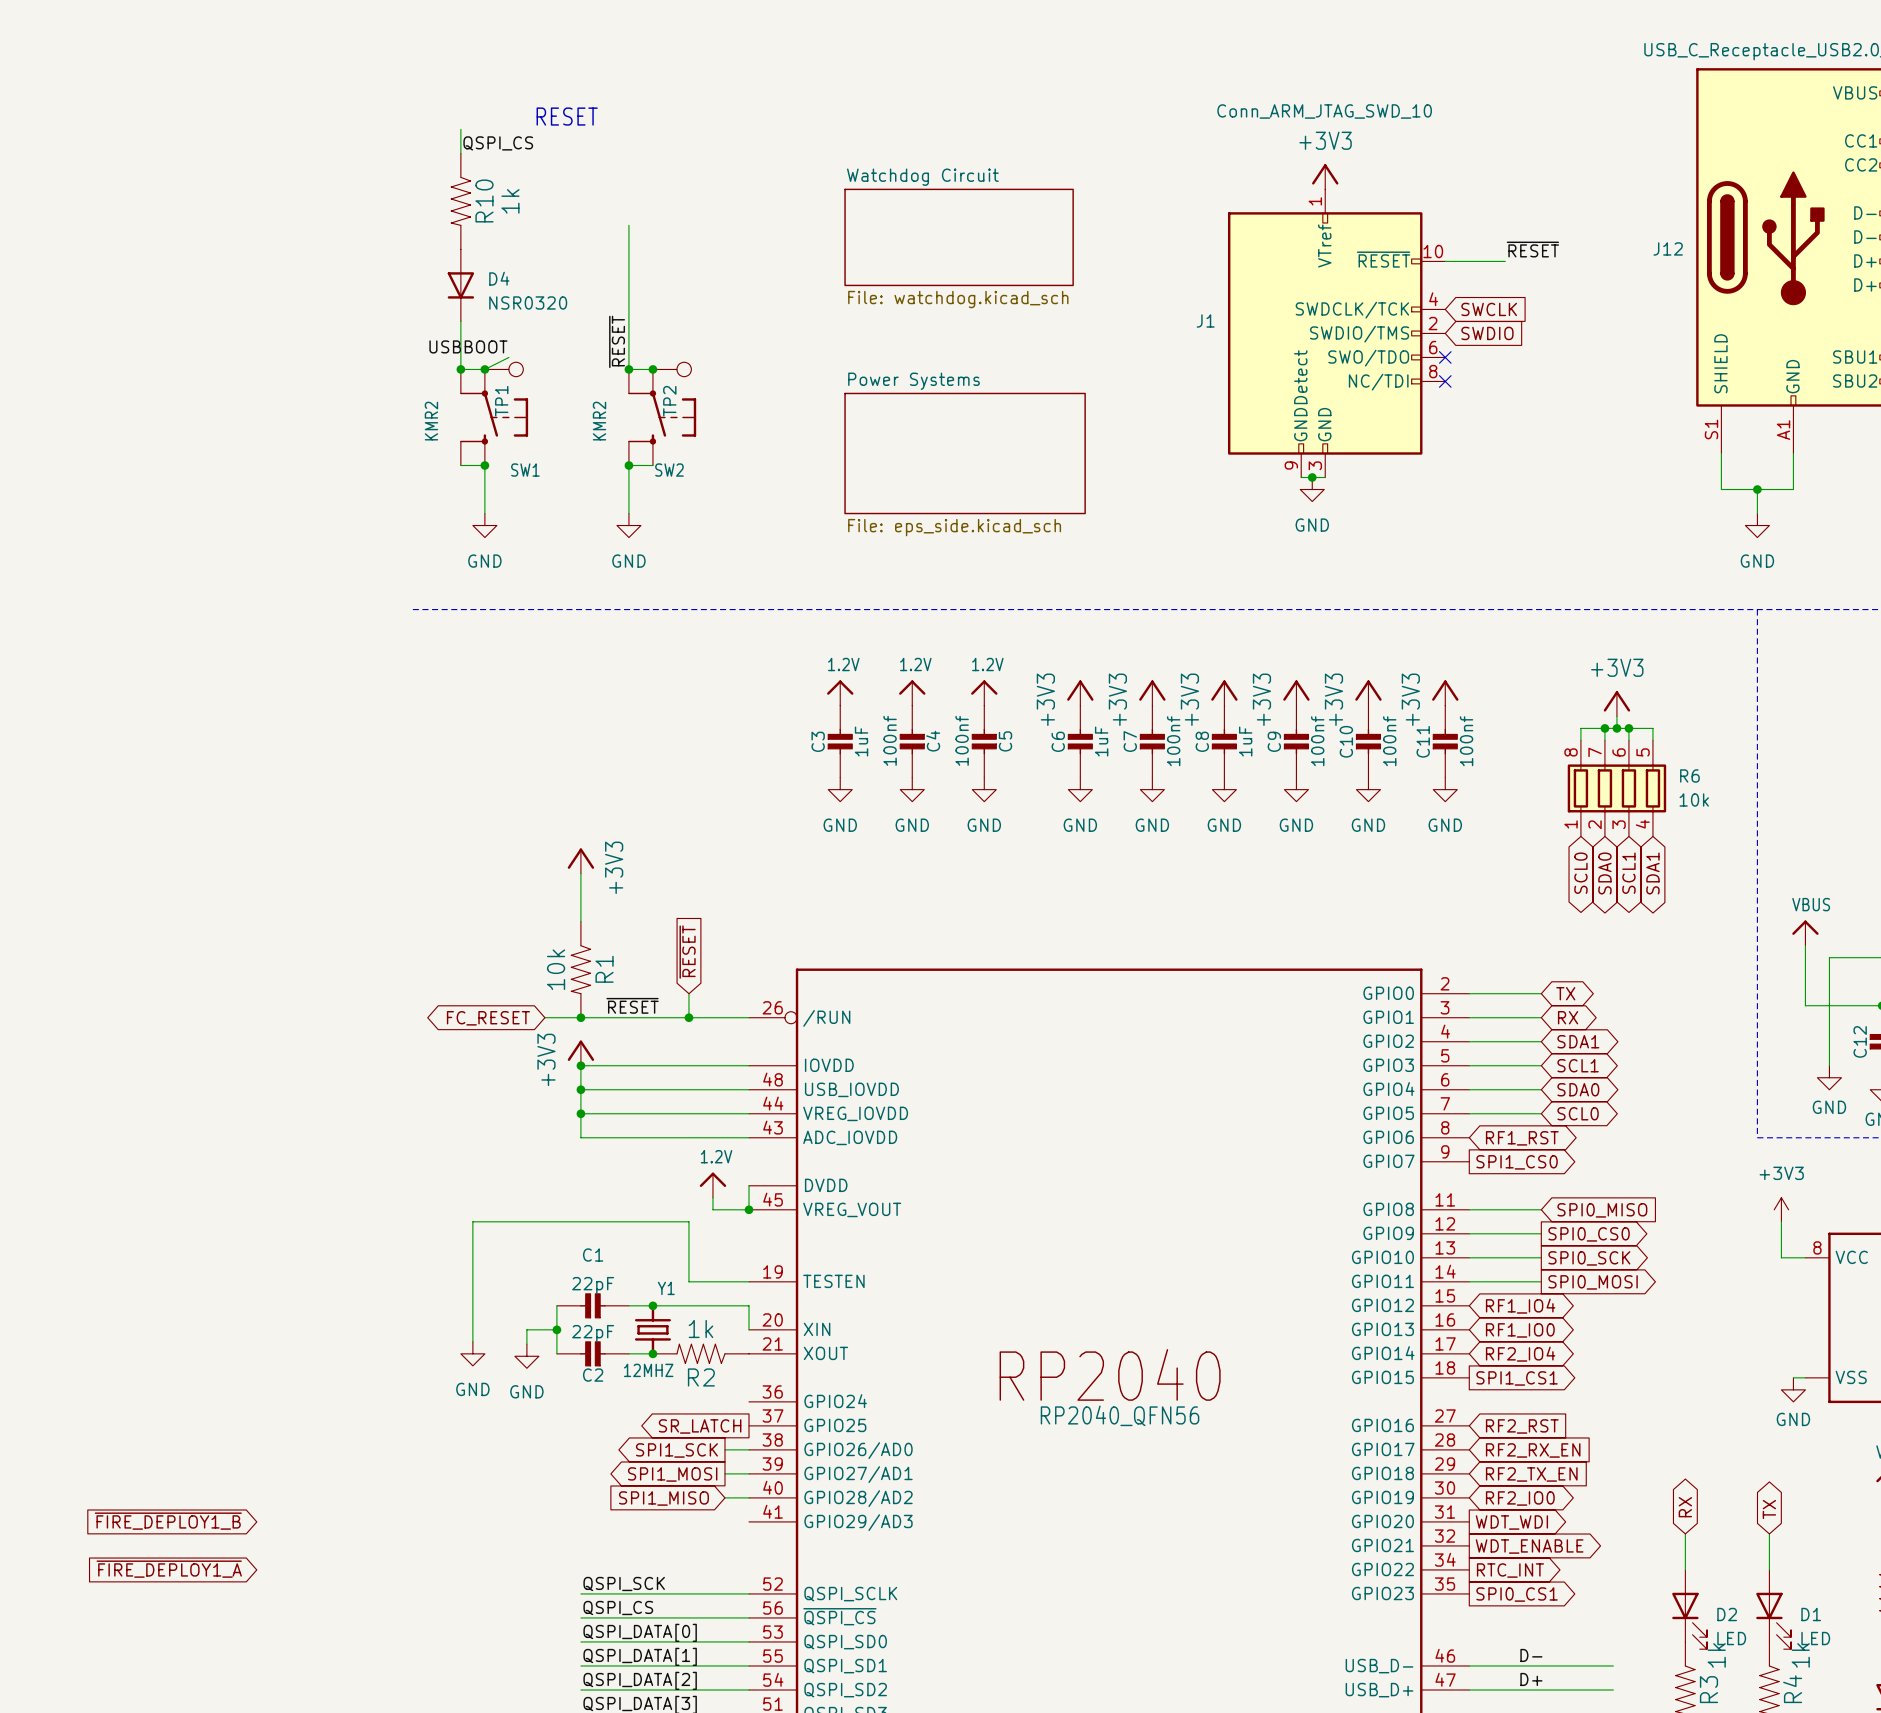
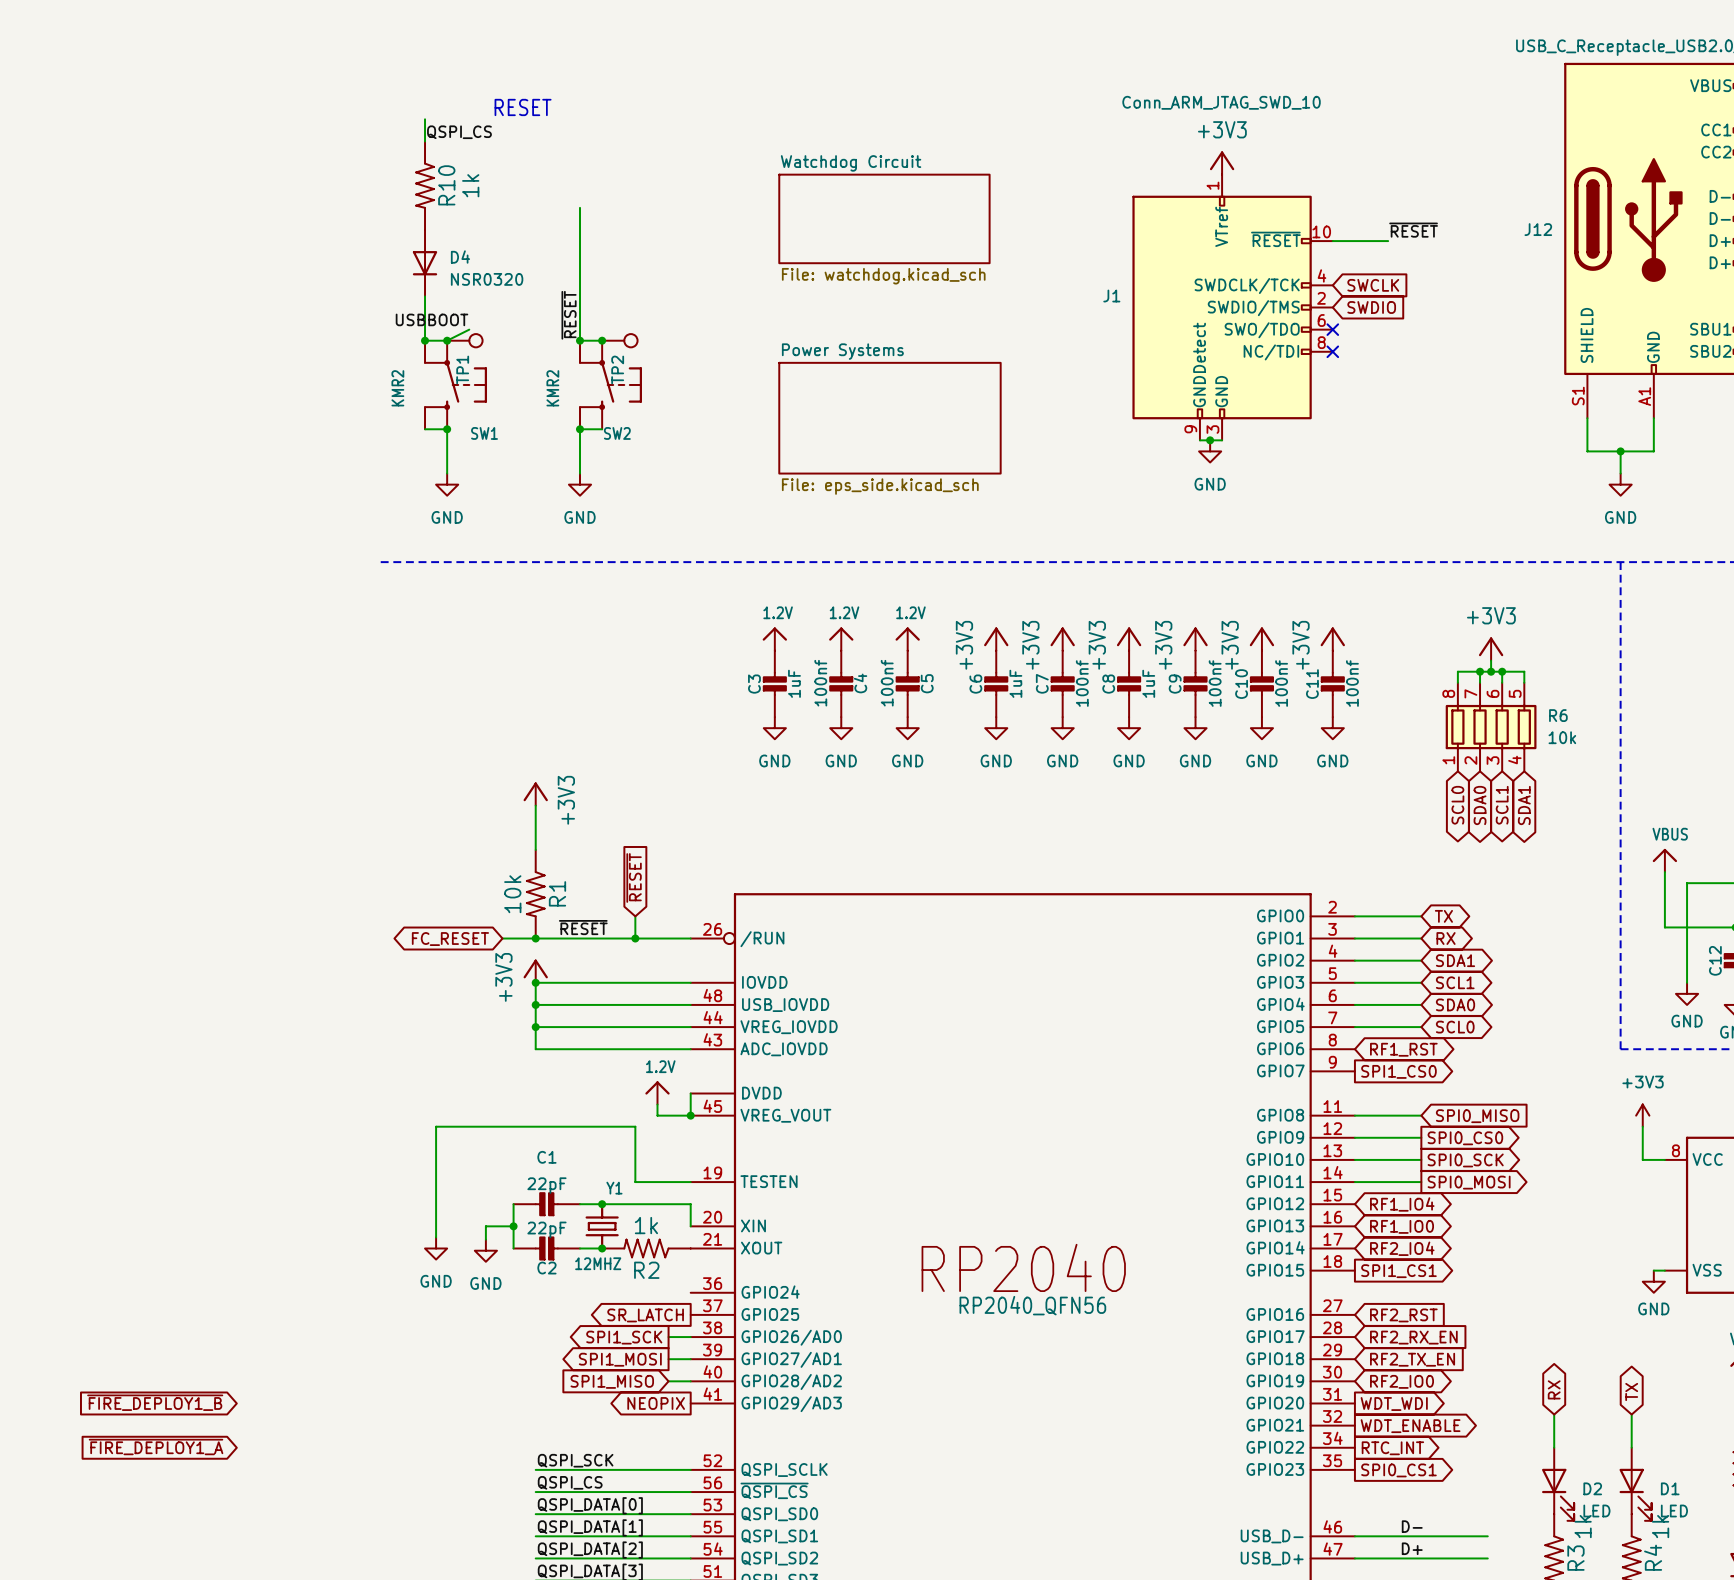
global label: none -> NEOPIX (656, 1403)

